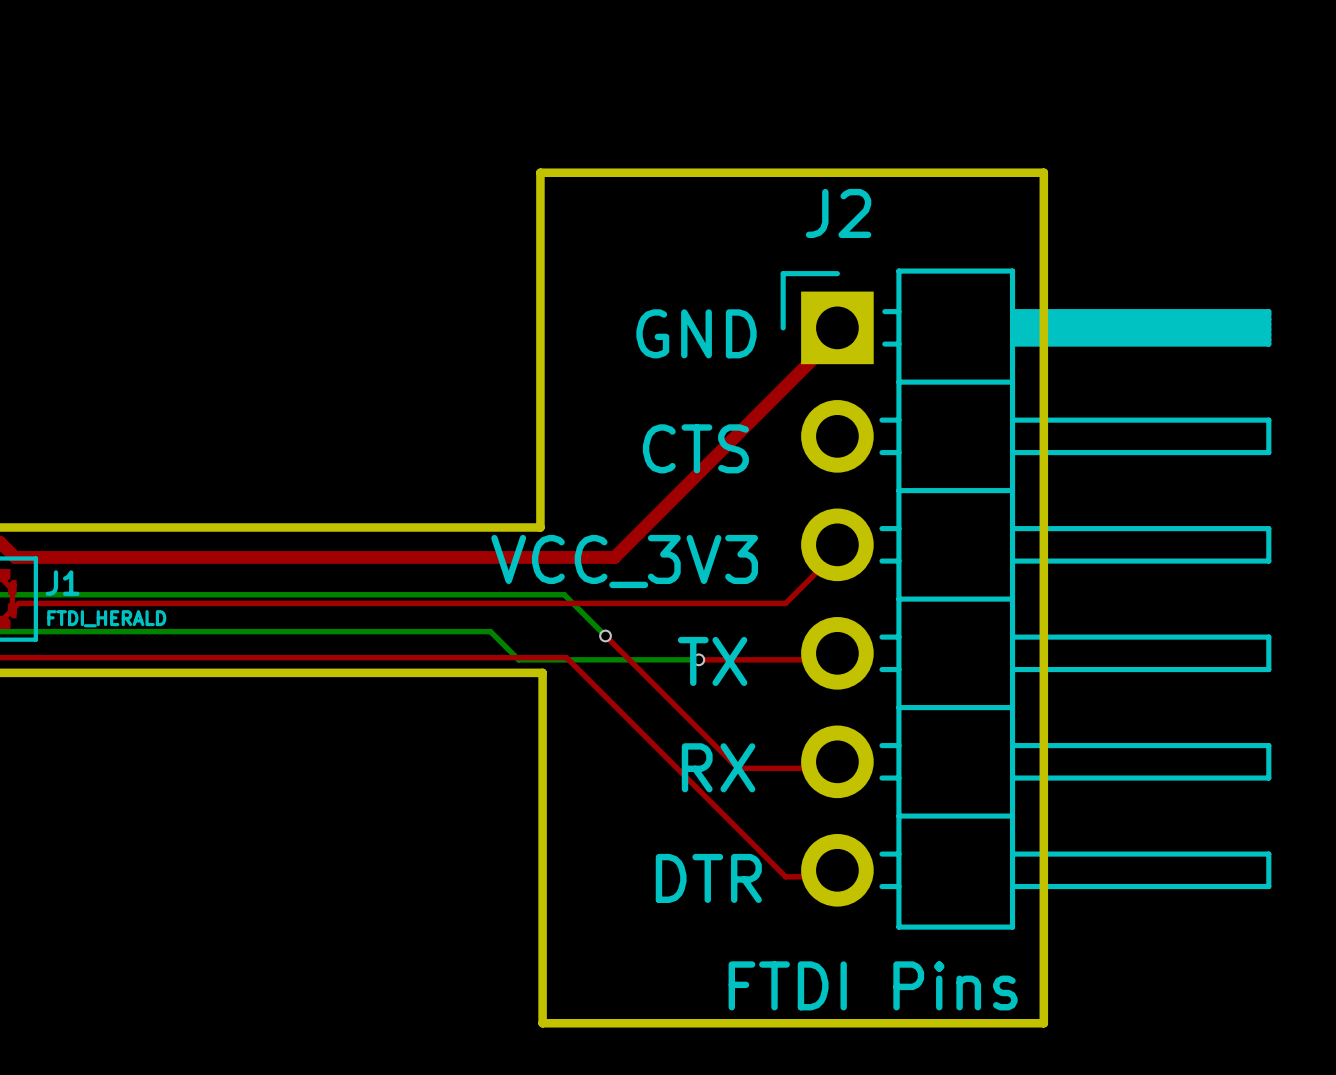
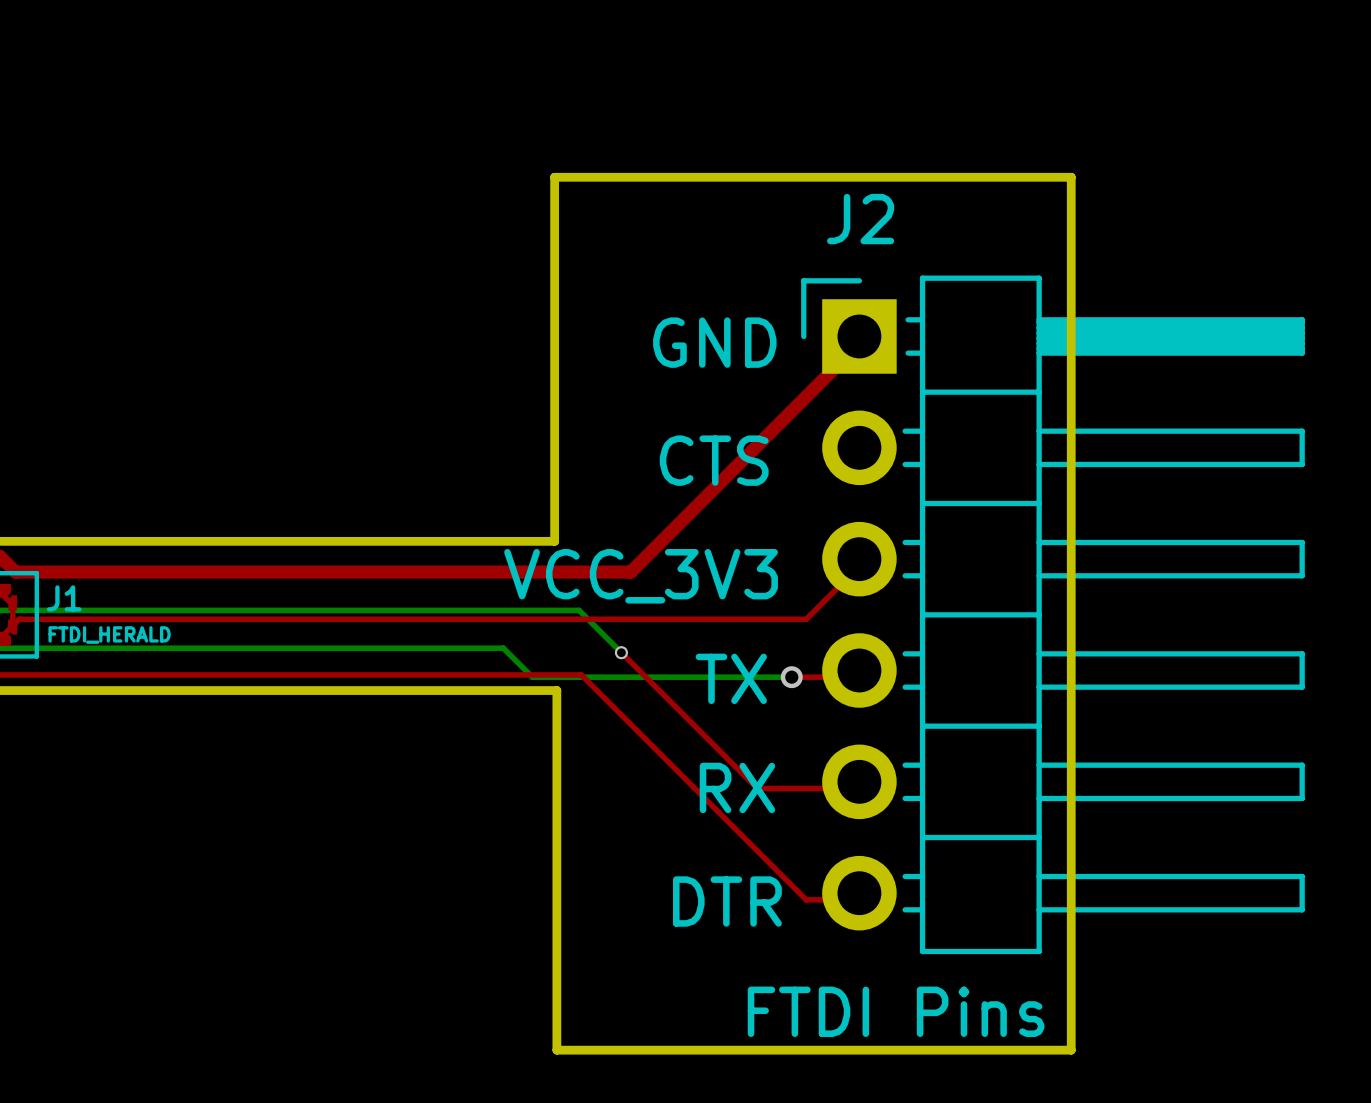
top track: (698, 659) (771, 659) -> none
bottom track: none -> (717, 677) (791, 677)
via: (698, 659) -> none
via: none -> (791, 677)

